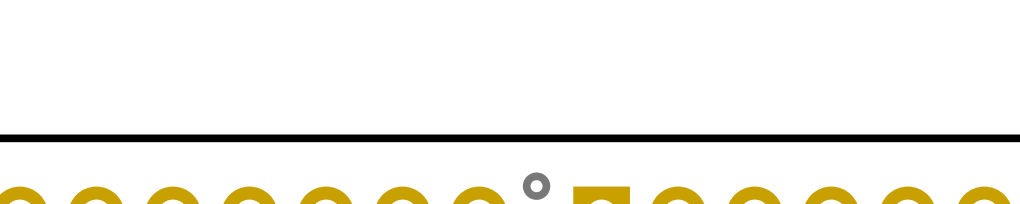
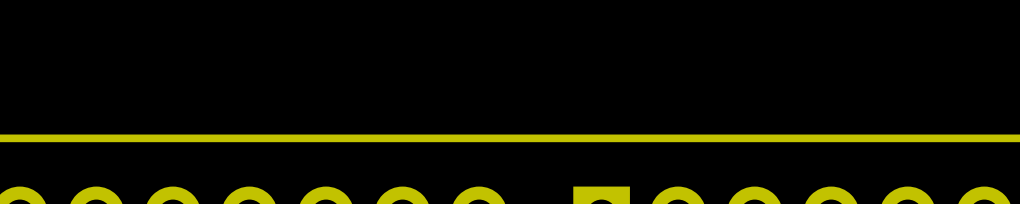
via: (536, 186) -> none

